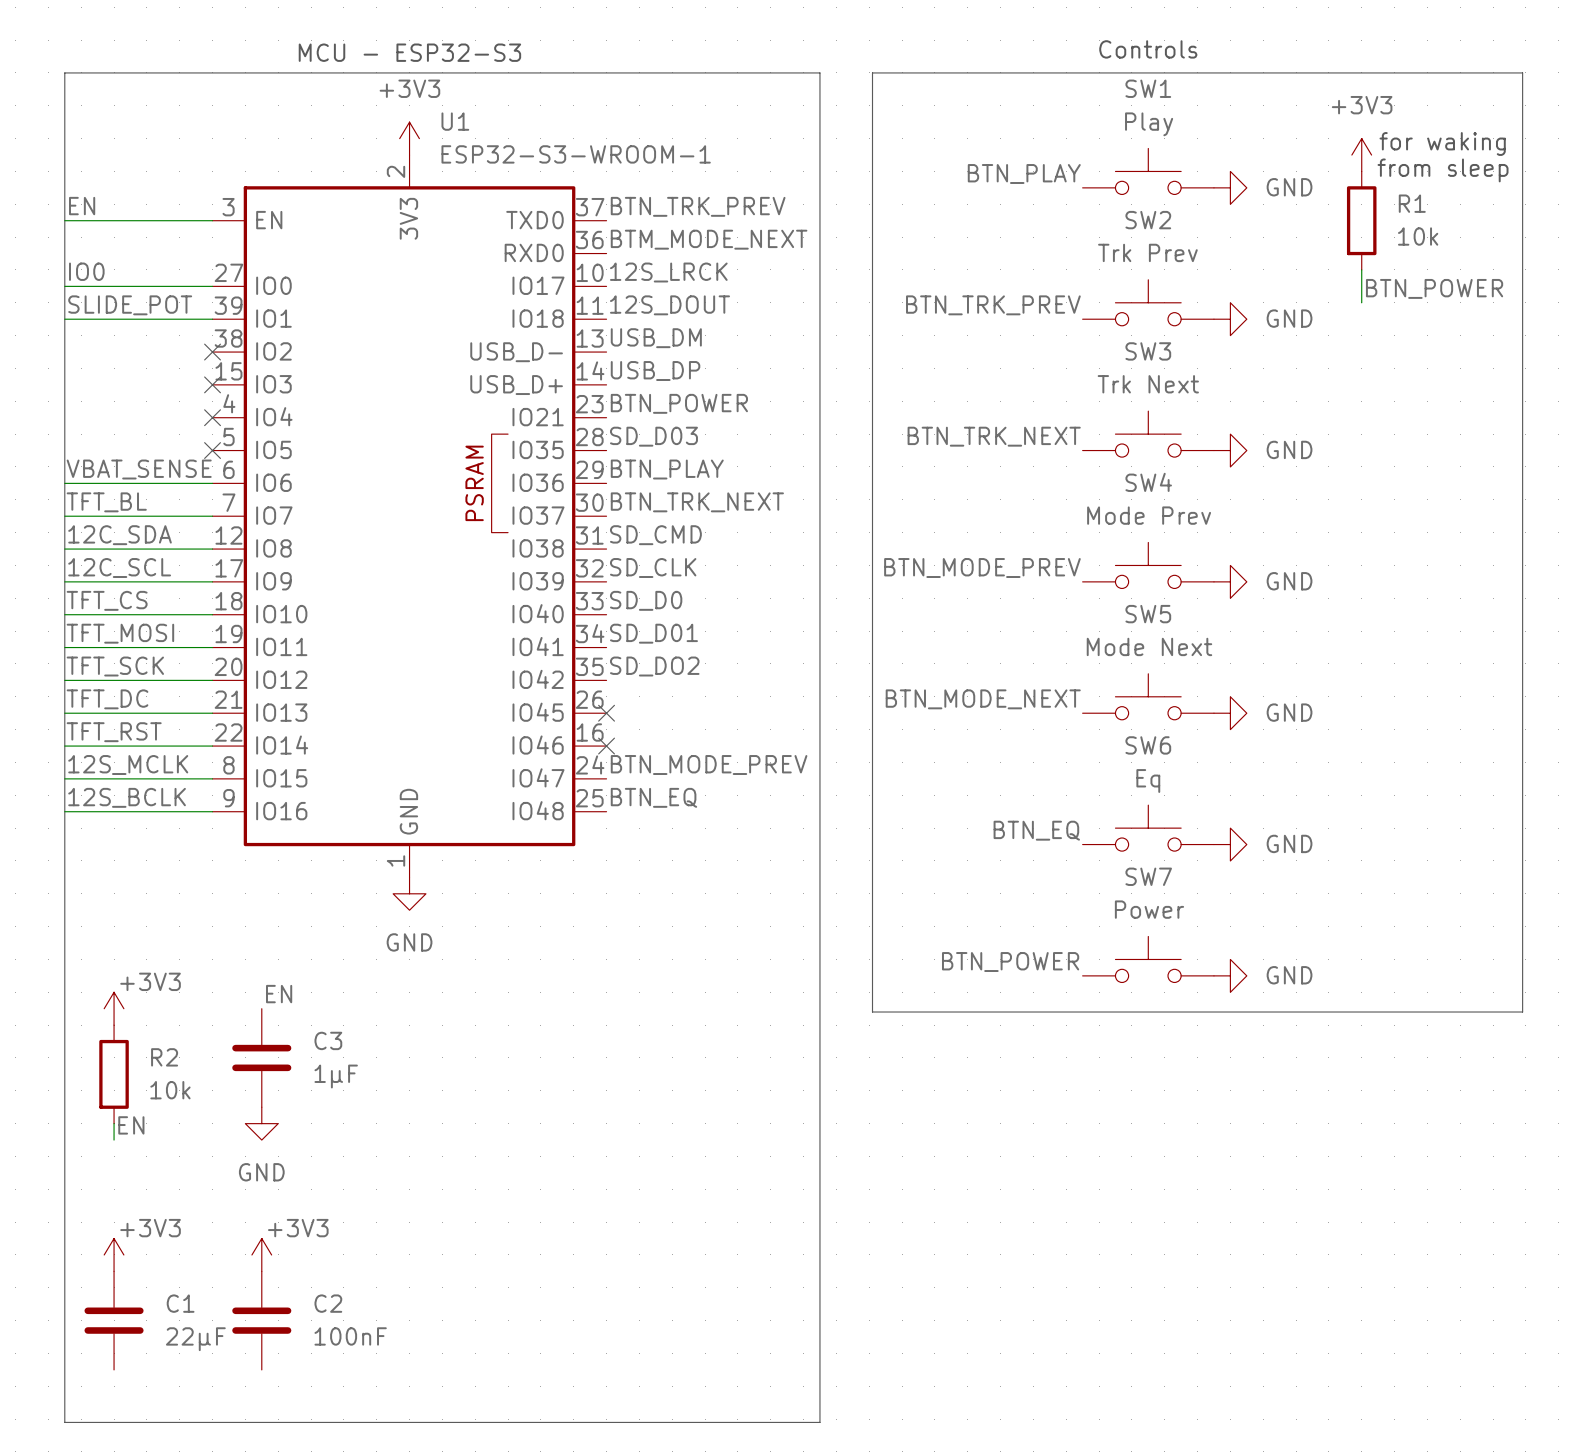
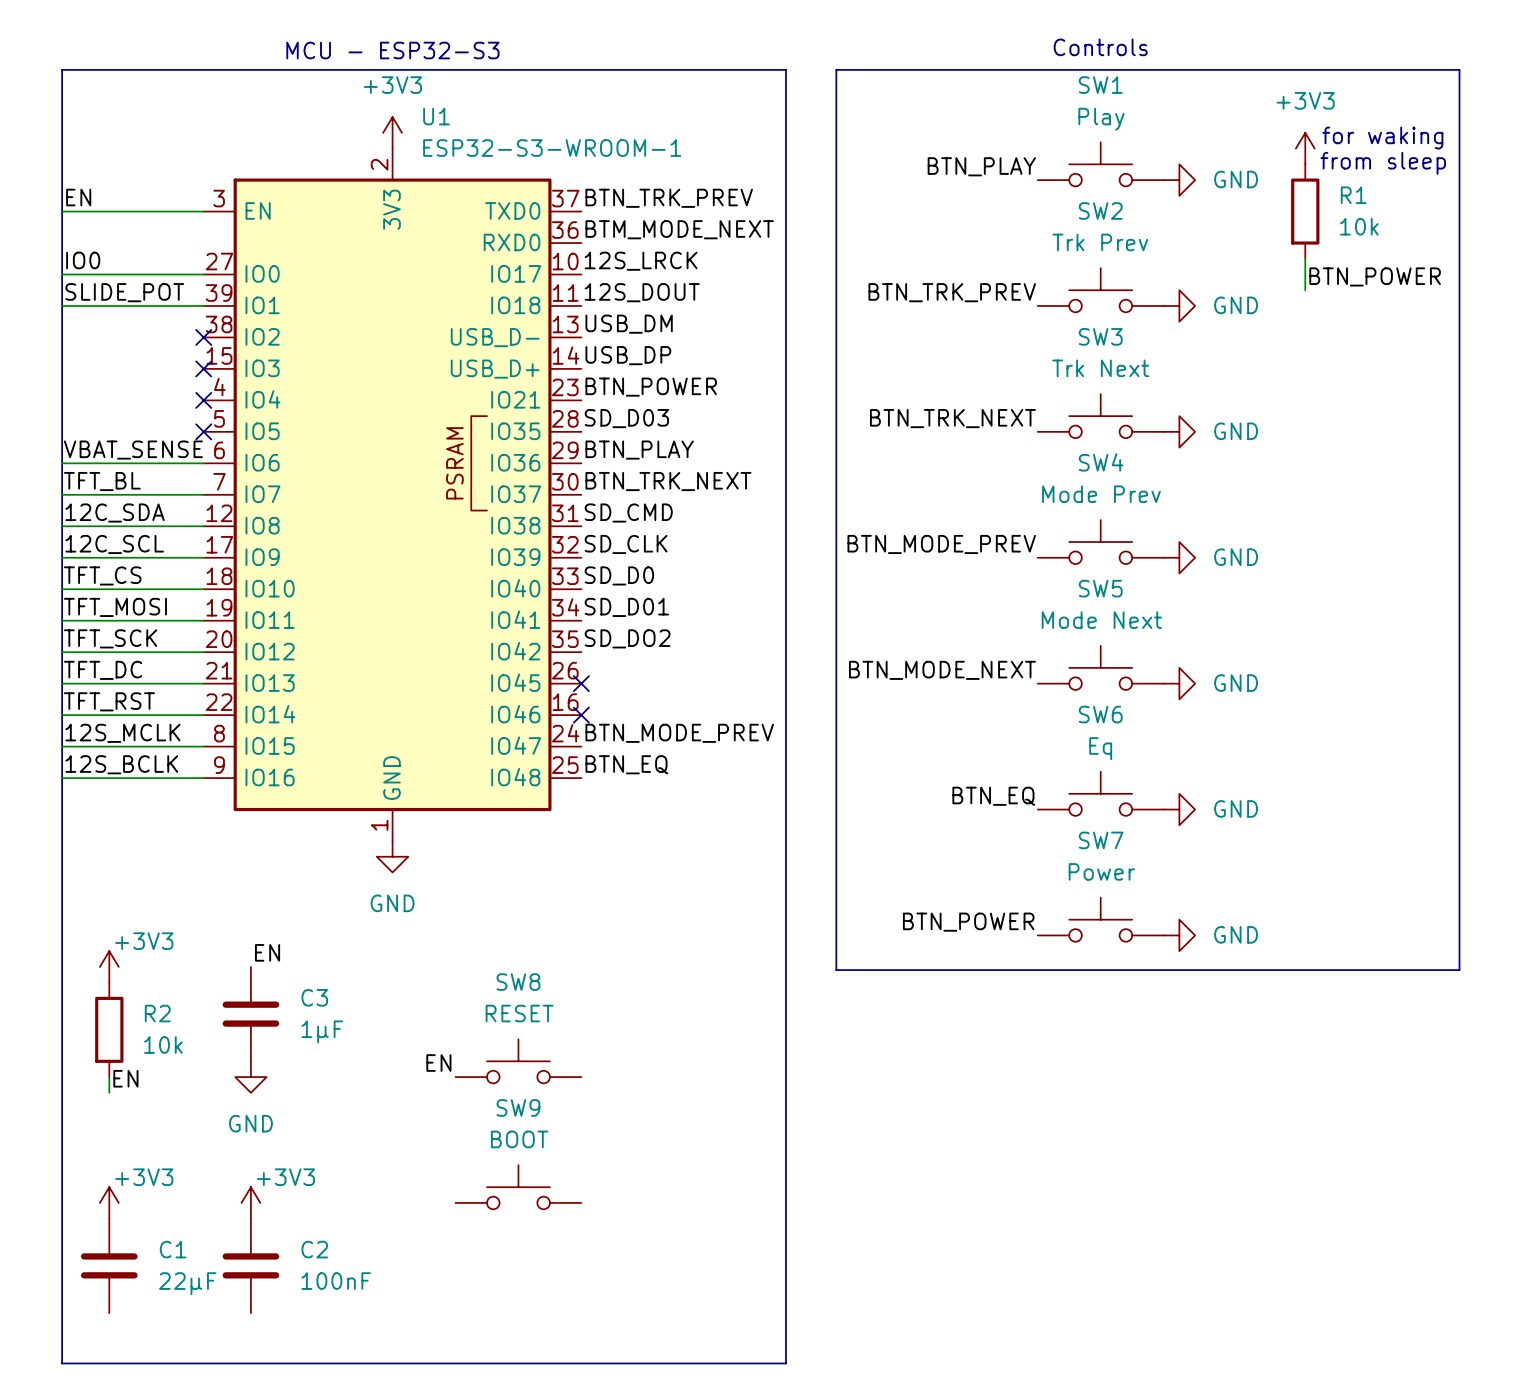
SW8: none -> RESET (518, 1061)
label: none -> EN (438, 1063)
SW9: none -> BOOT (518, 1187)

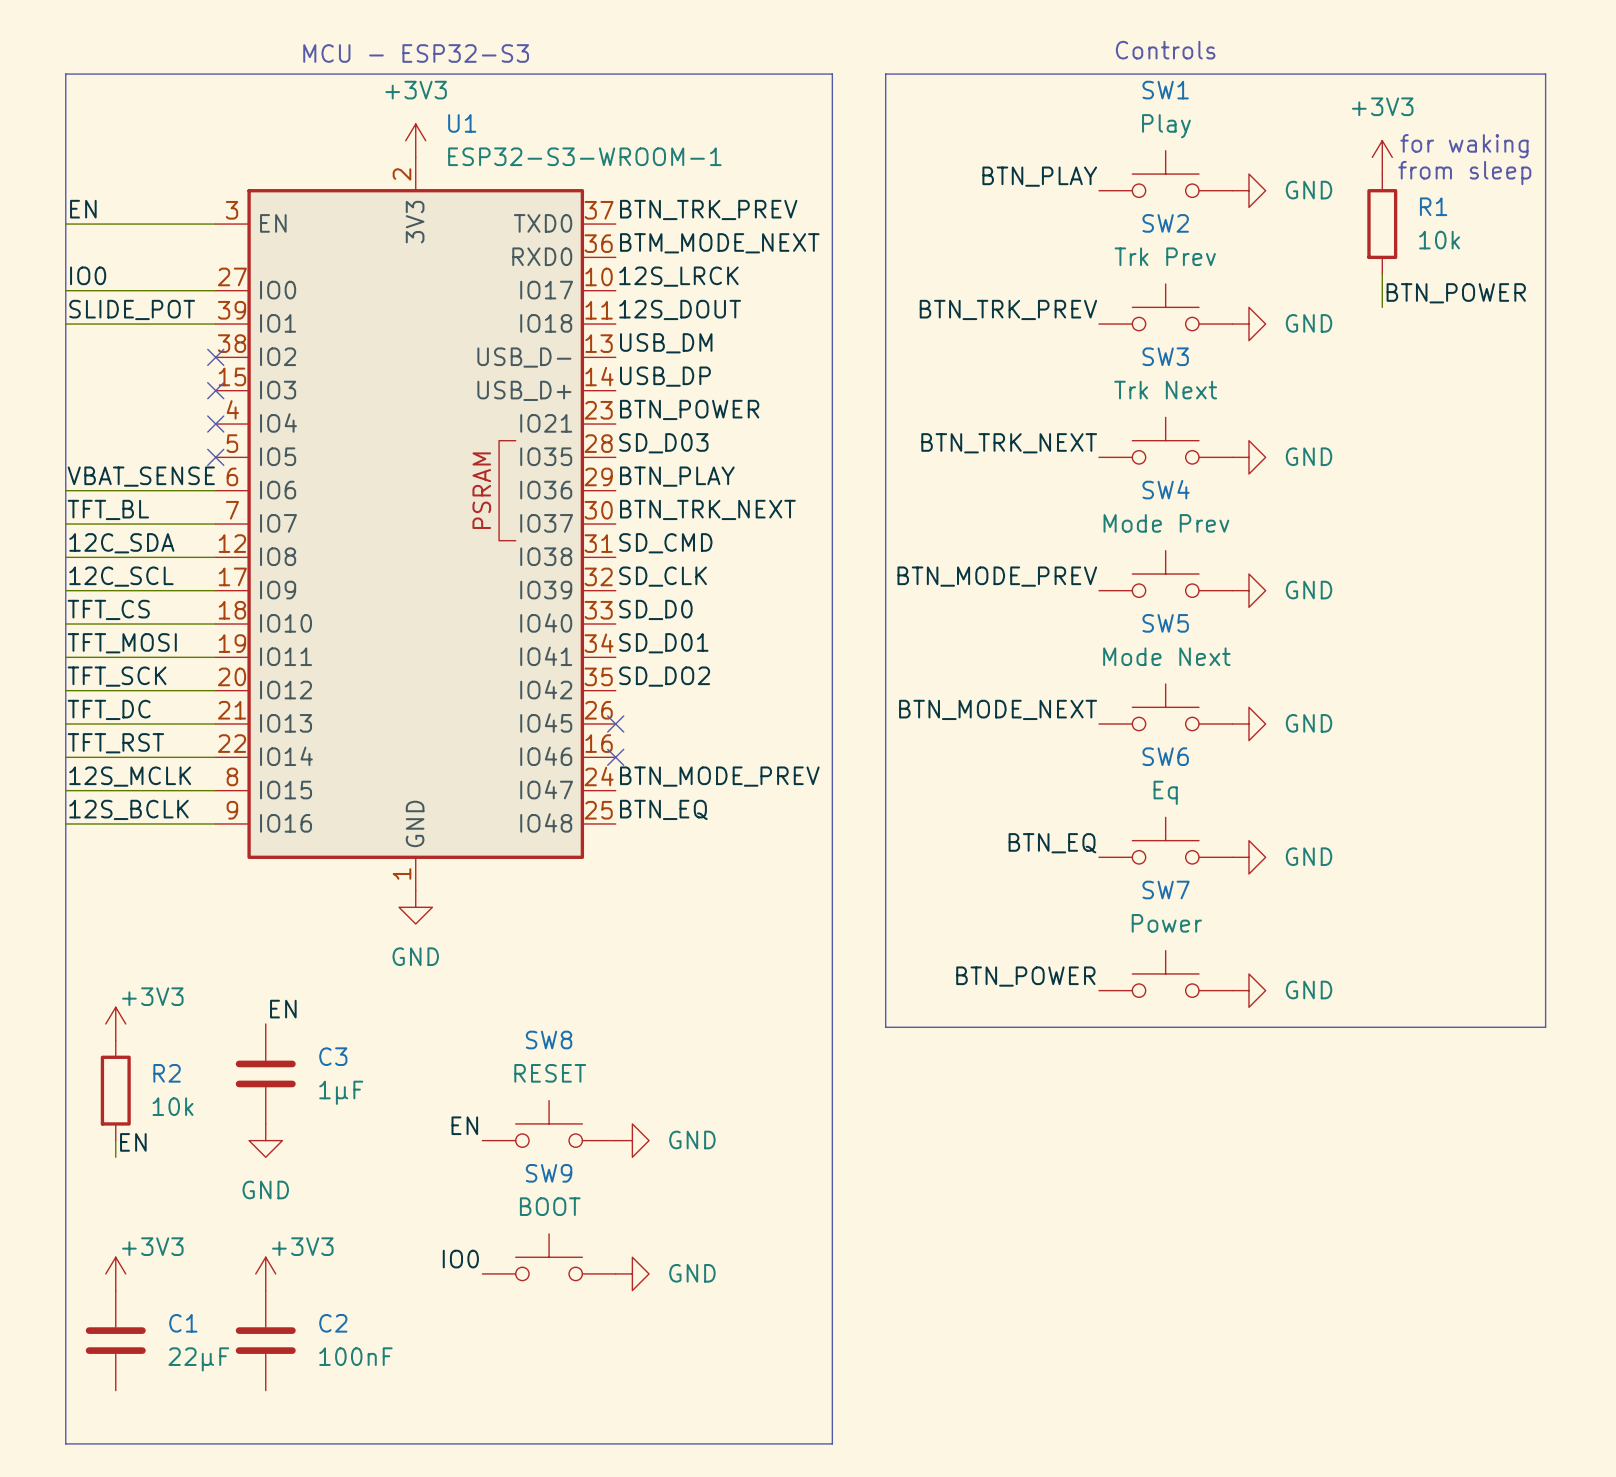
power symbol: none -> GND (632, 1140)
label: none -> IO0 (460, 1259)
power symbol: none -> GND (632, 1273)

